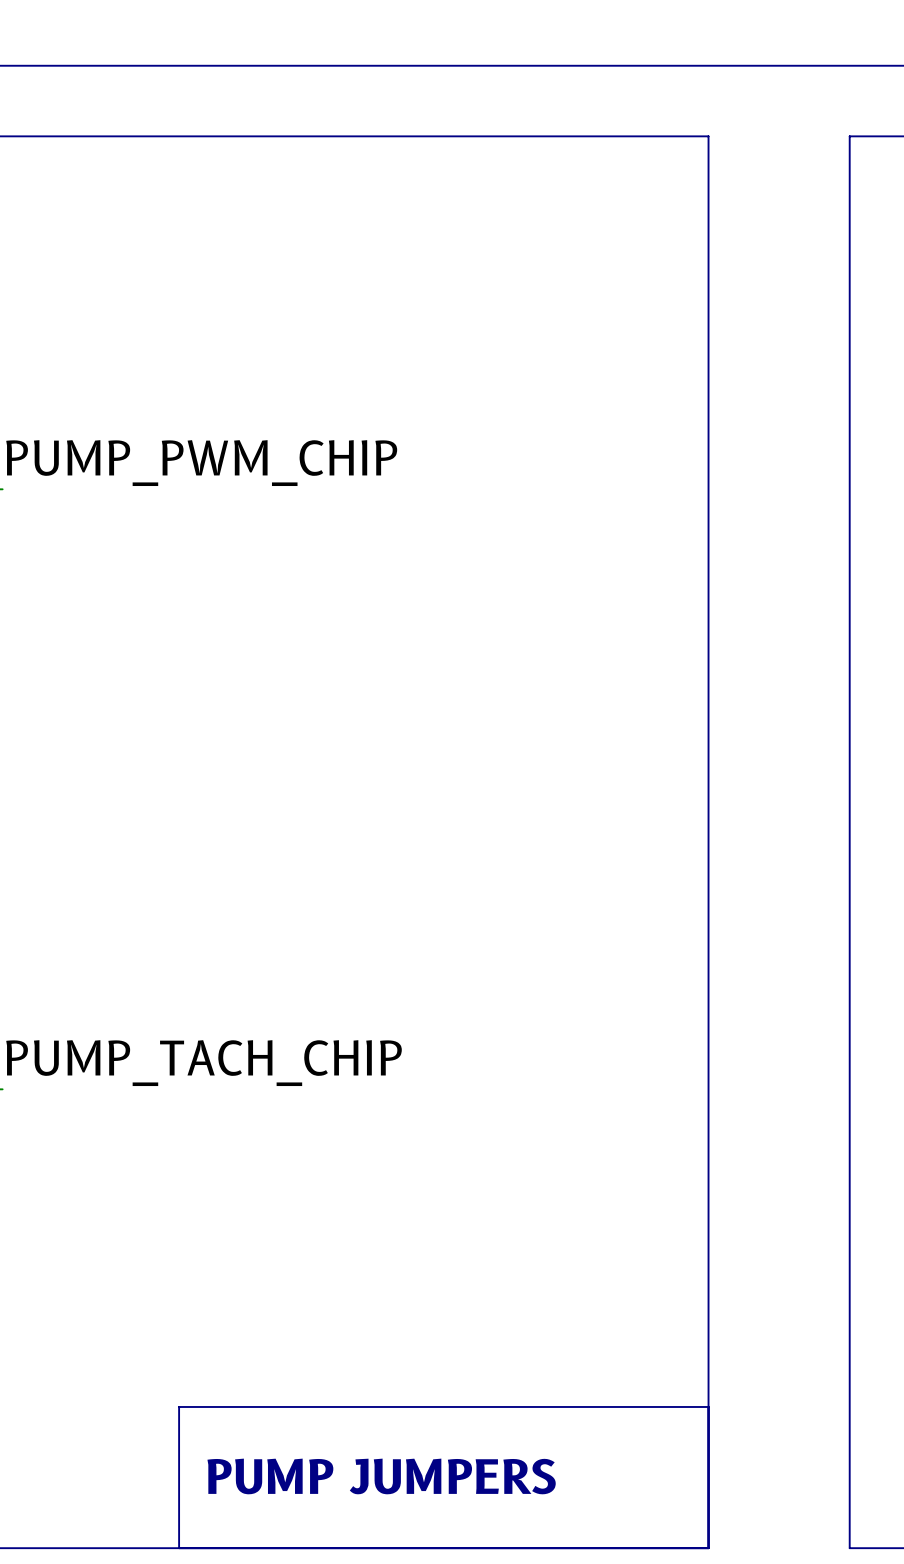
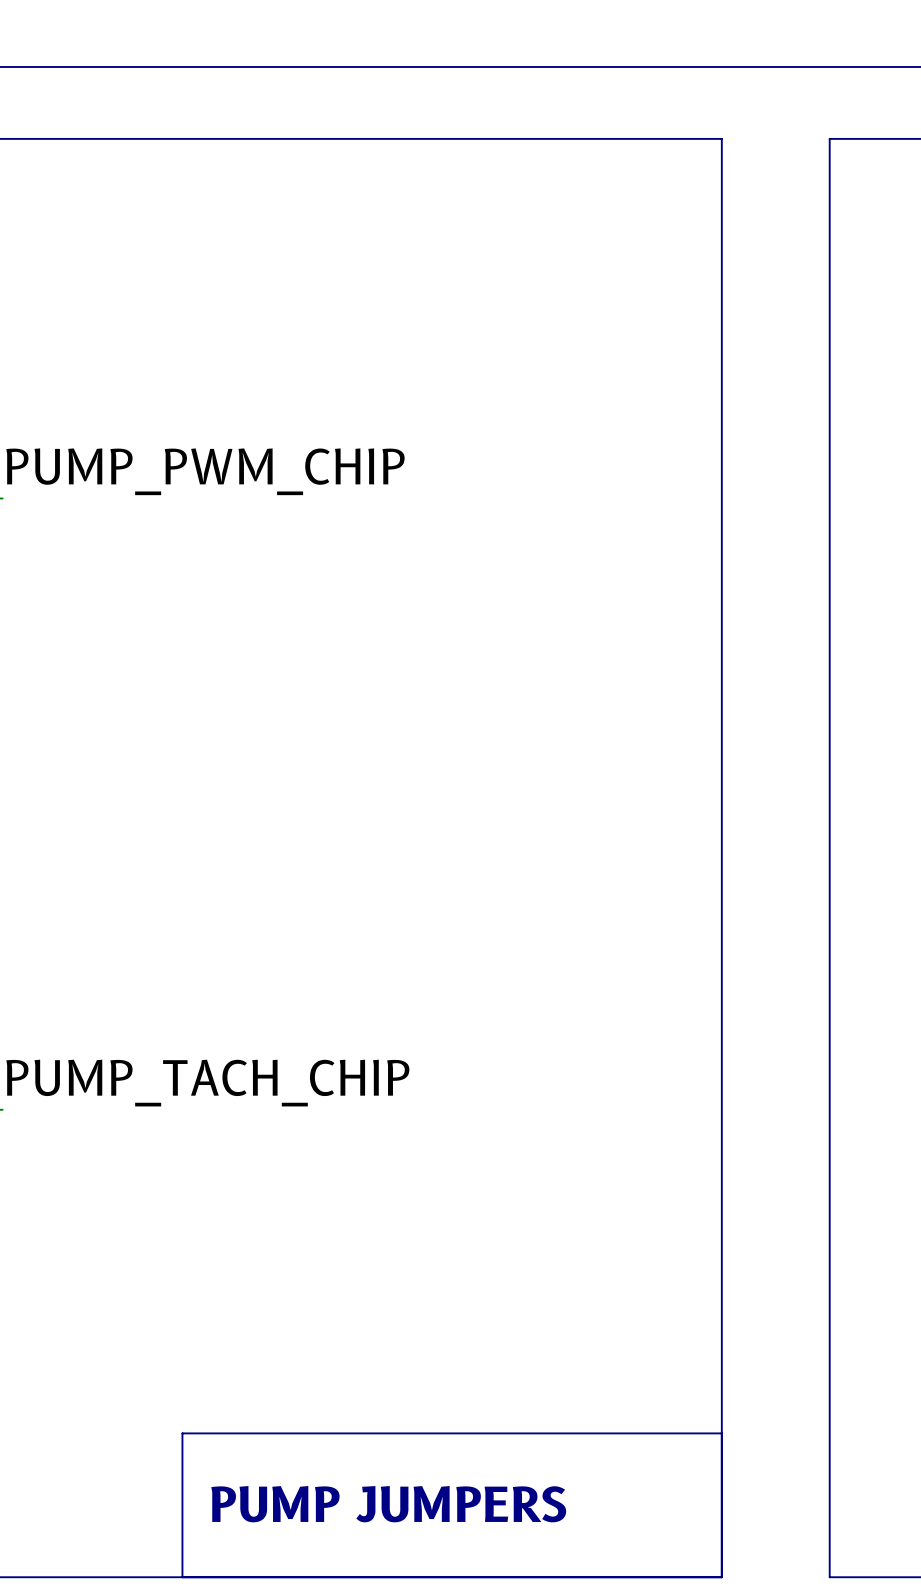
line: (849, 136) (849, 1548) -> (865, 138) (829, 138) (829, 1577) (865, 1577)

